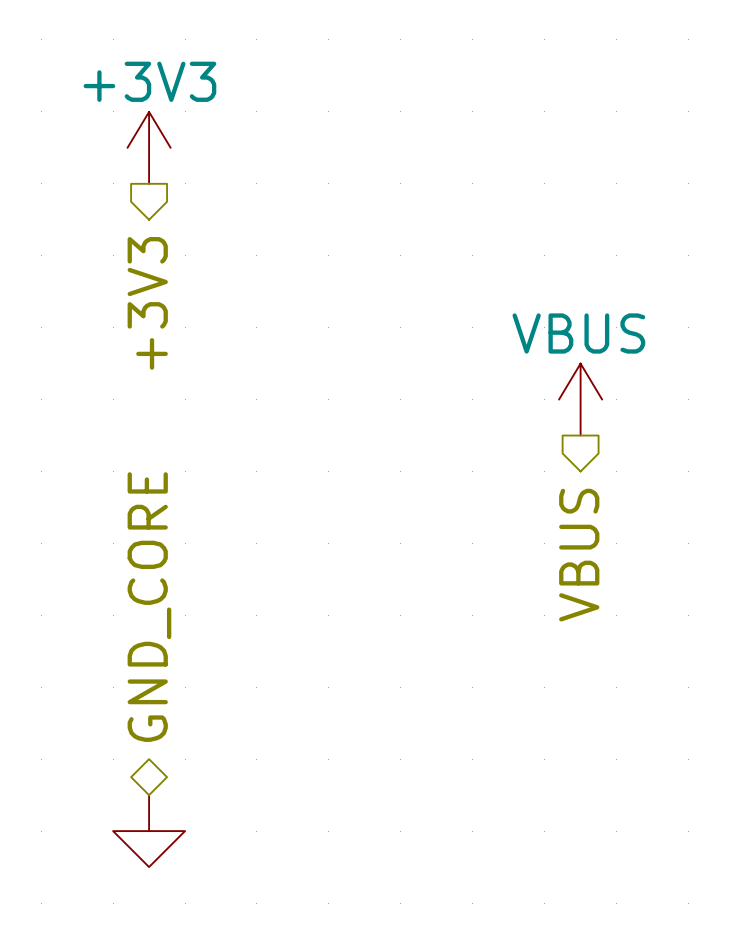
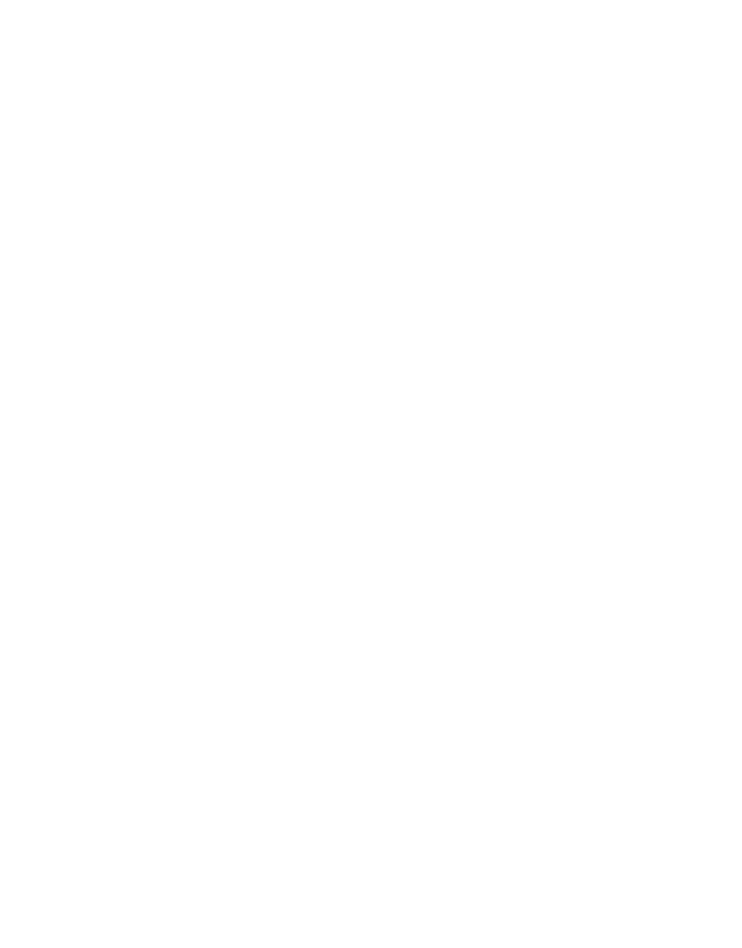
power symbol: +3V3 (149, 147) -> none
hierarchical label: +3V3 (147, 303) -> none
power symbol: VBUS (580, 399) -> none
hierarchical label: VBUS (579, 555) -> none
hierarchical label: GND_CORE (149, 607) -> none
power symbol: (149, 831) -> none

